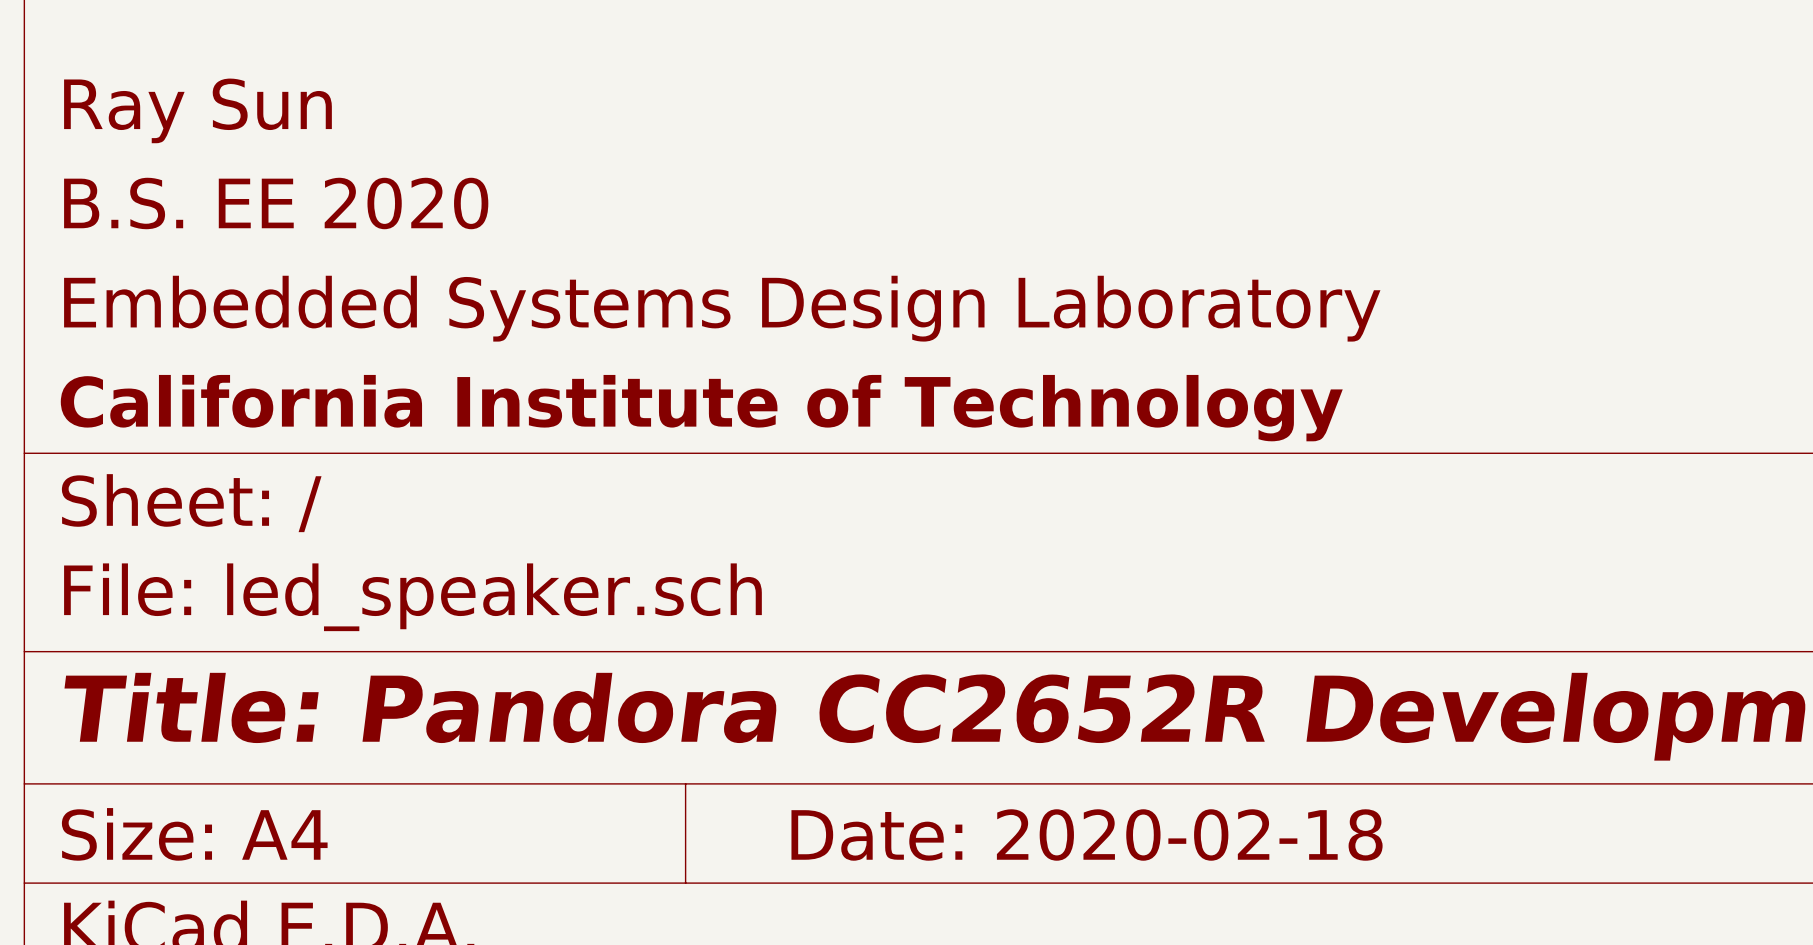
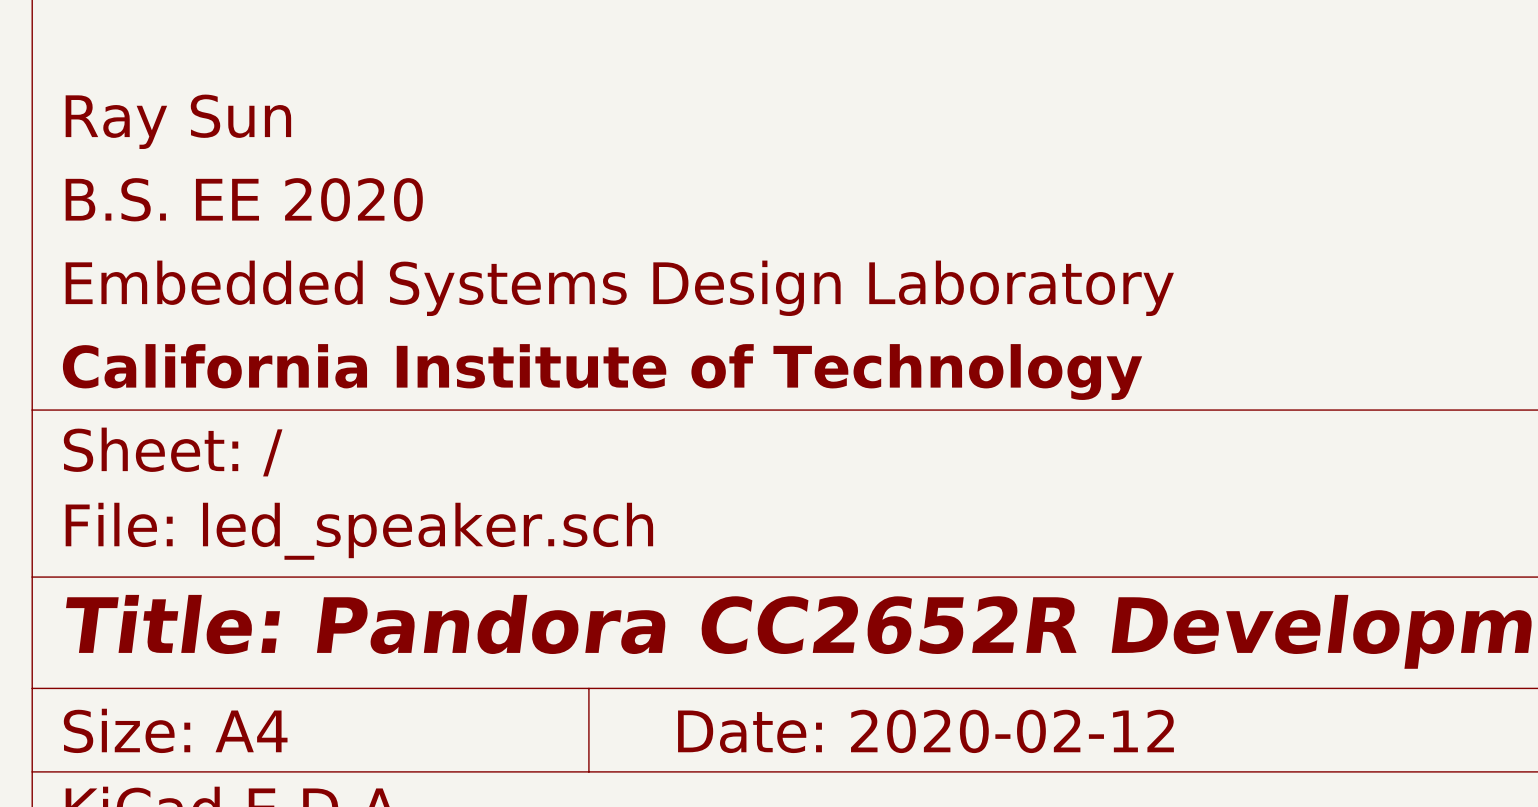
title block: Date: 2020-02-18 (1087, 834) -> Date: 2020-02-12 (925, 731)

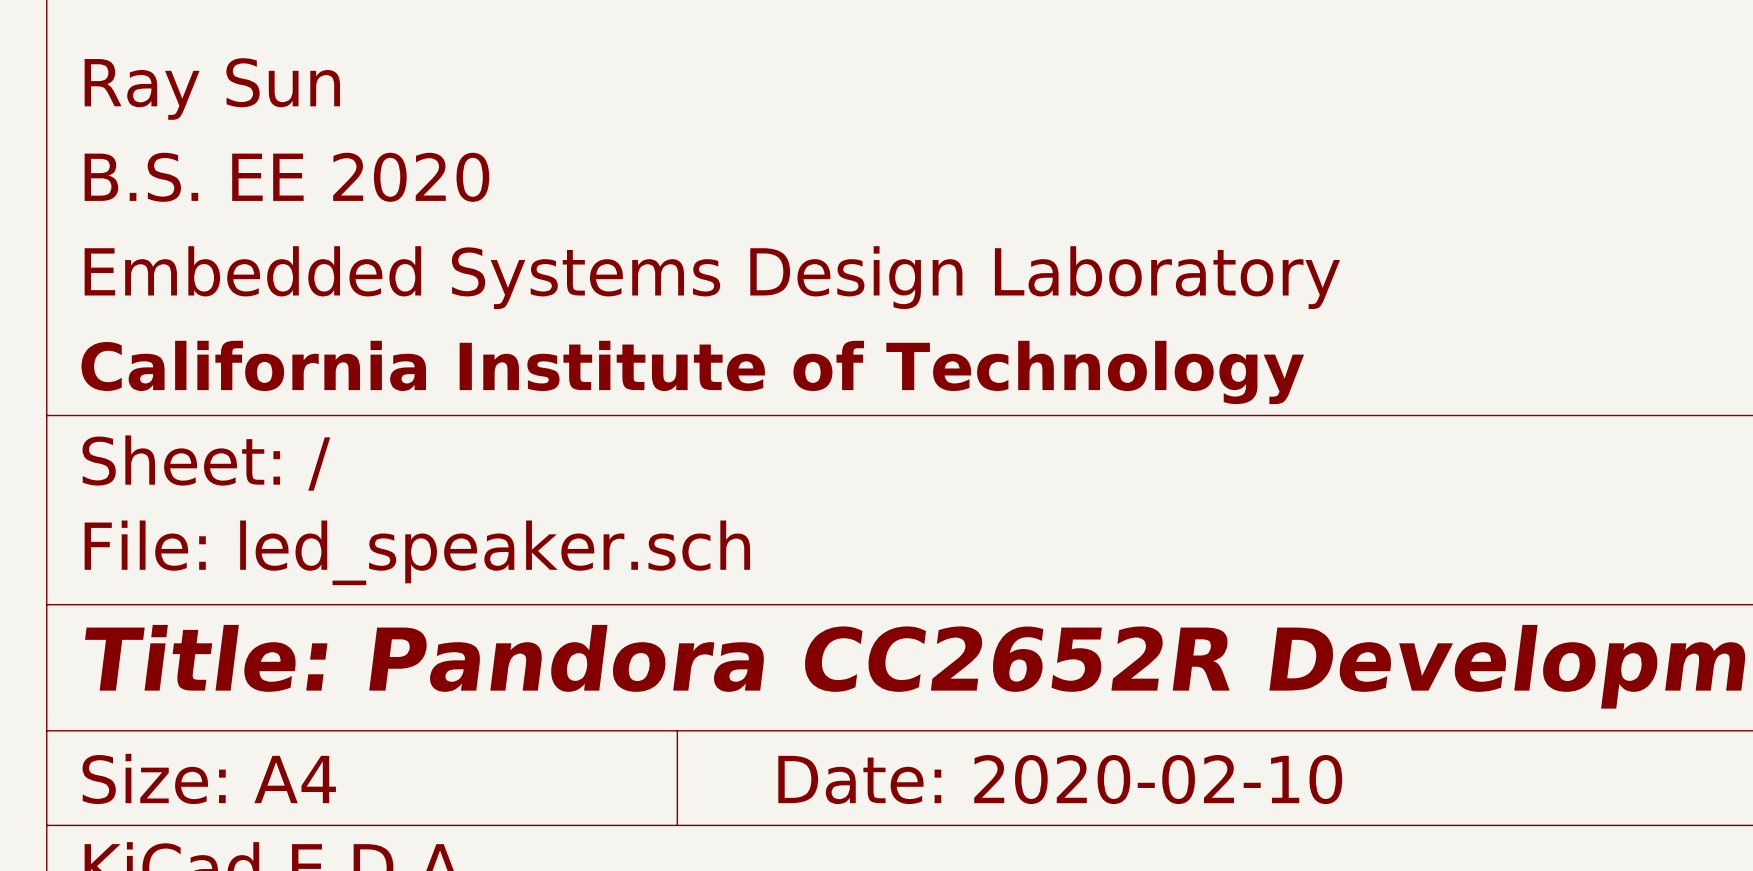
title block: Date: 2020-02-12 (925, 731) -> Date: 2020-02-10 (1060, 779)

